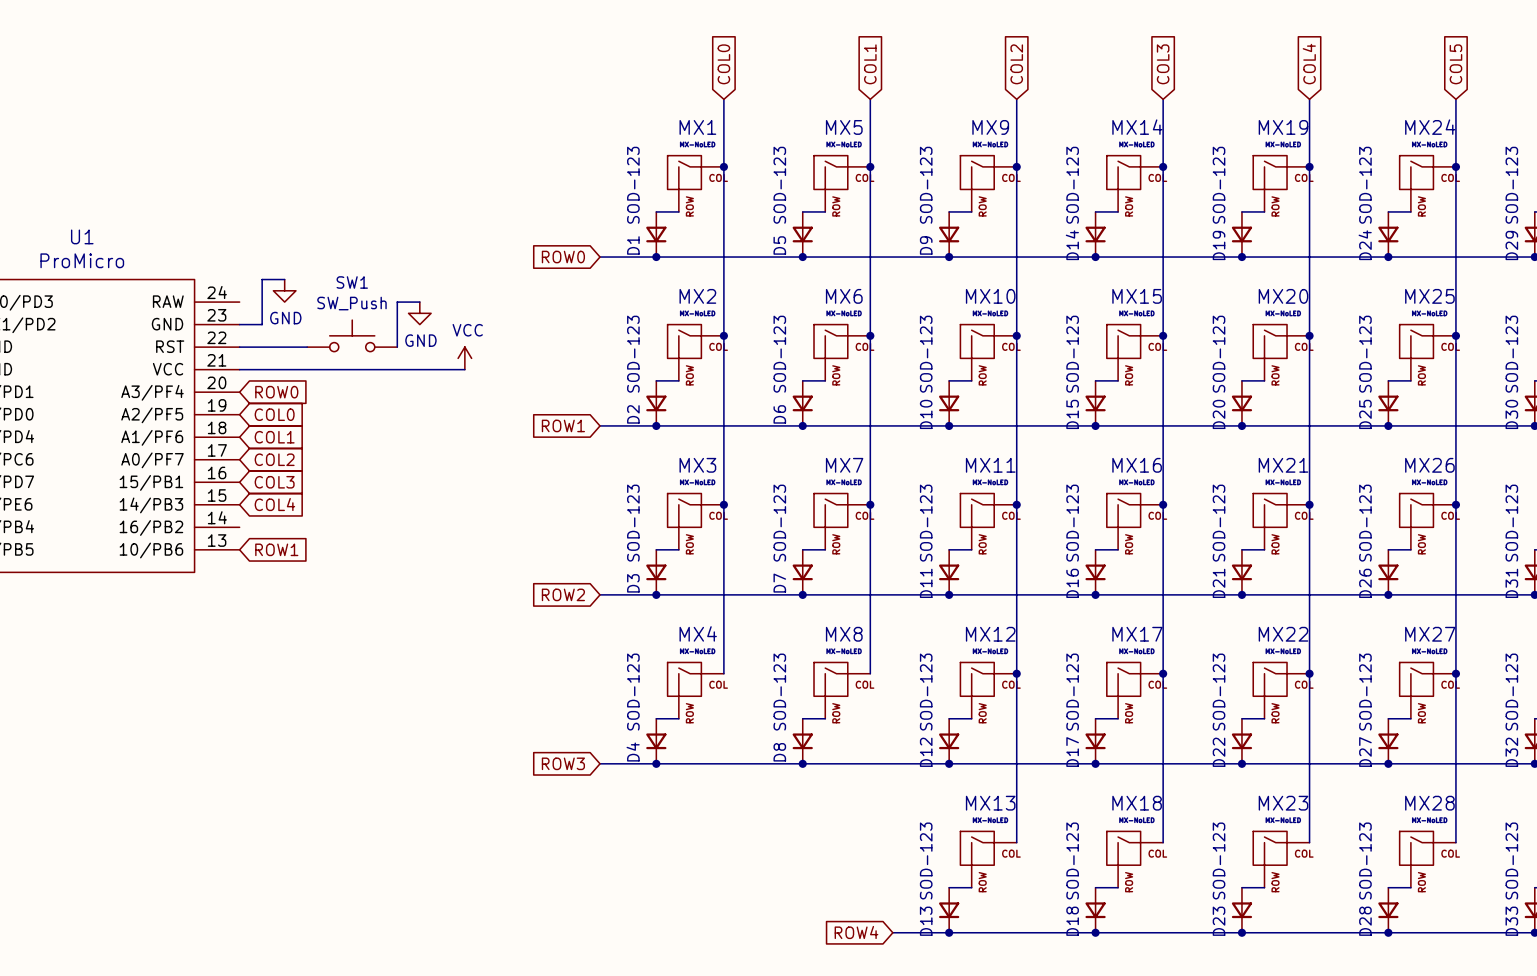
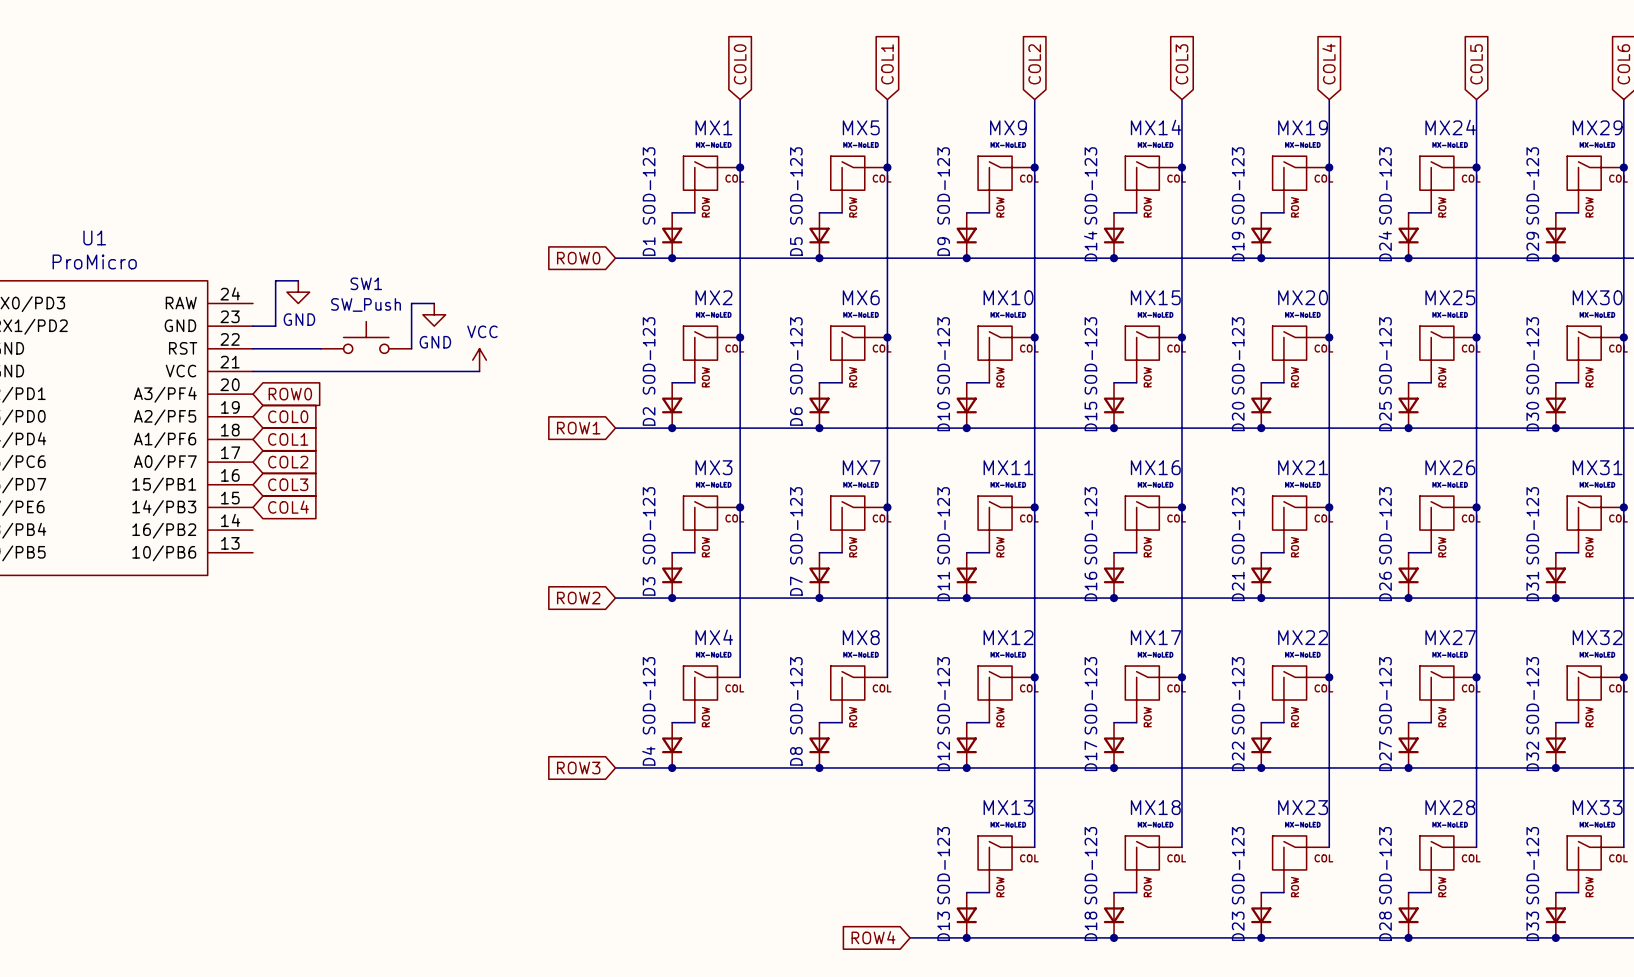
global label: ROW1 (276, 549) -> none

